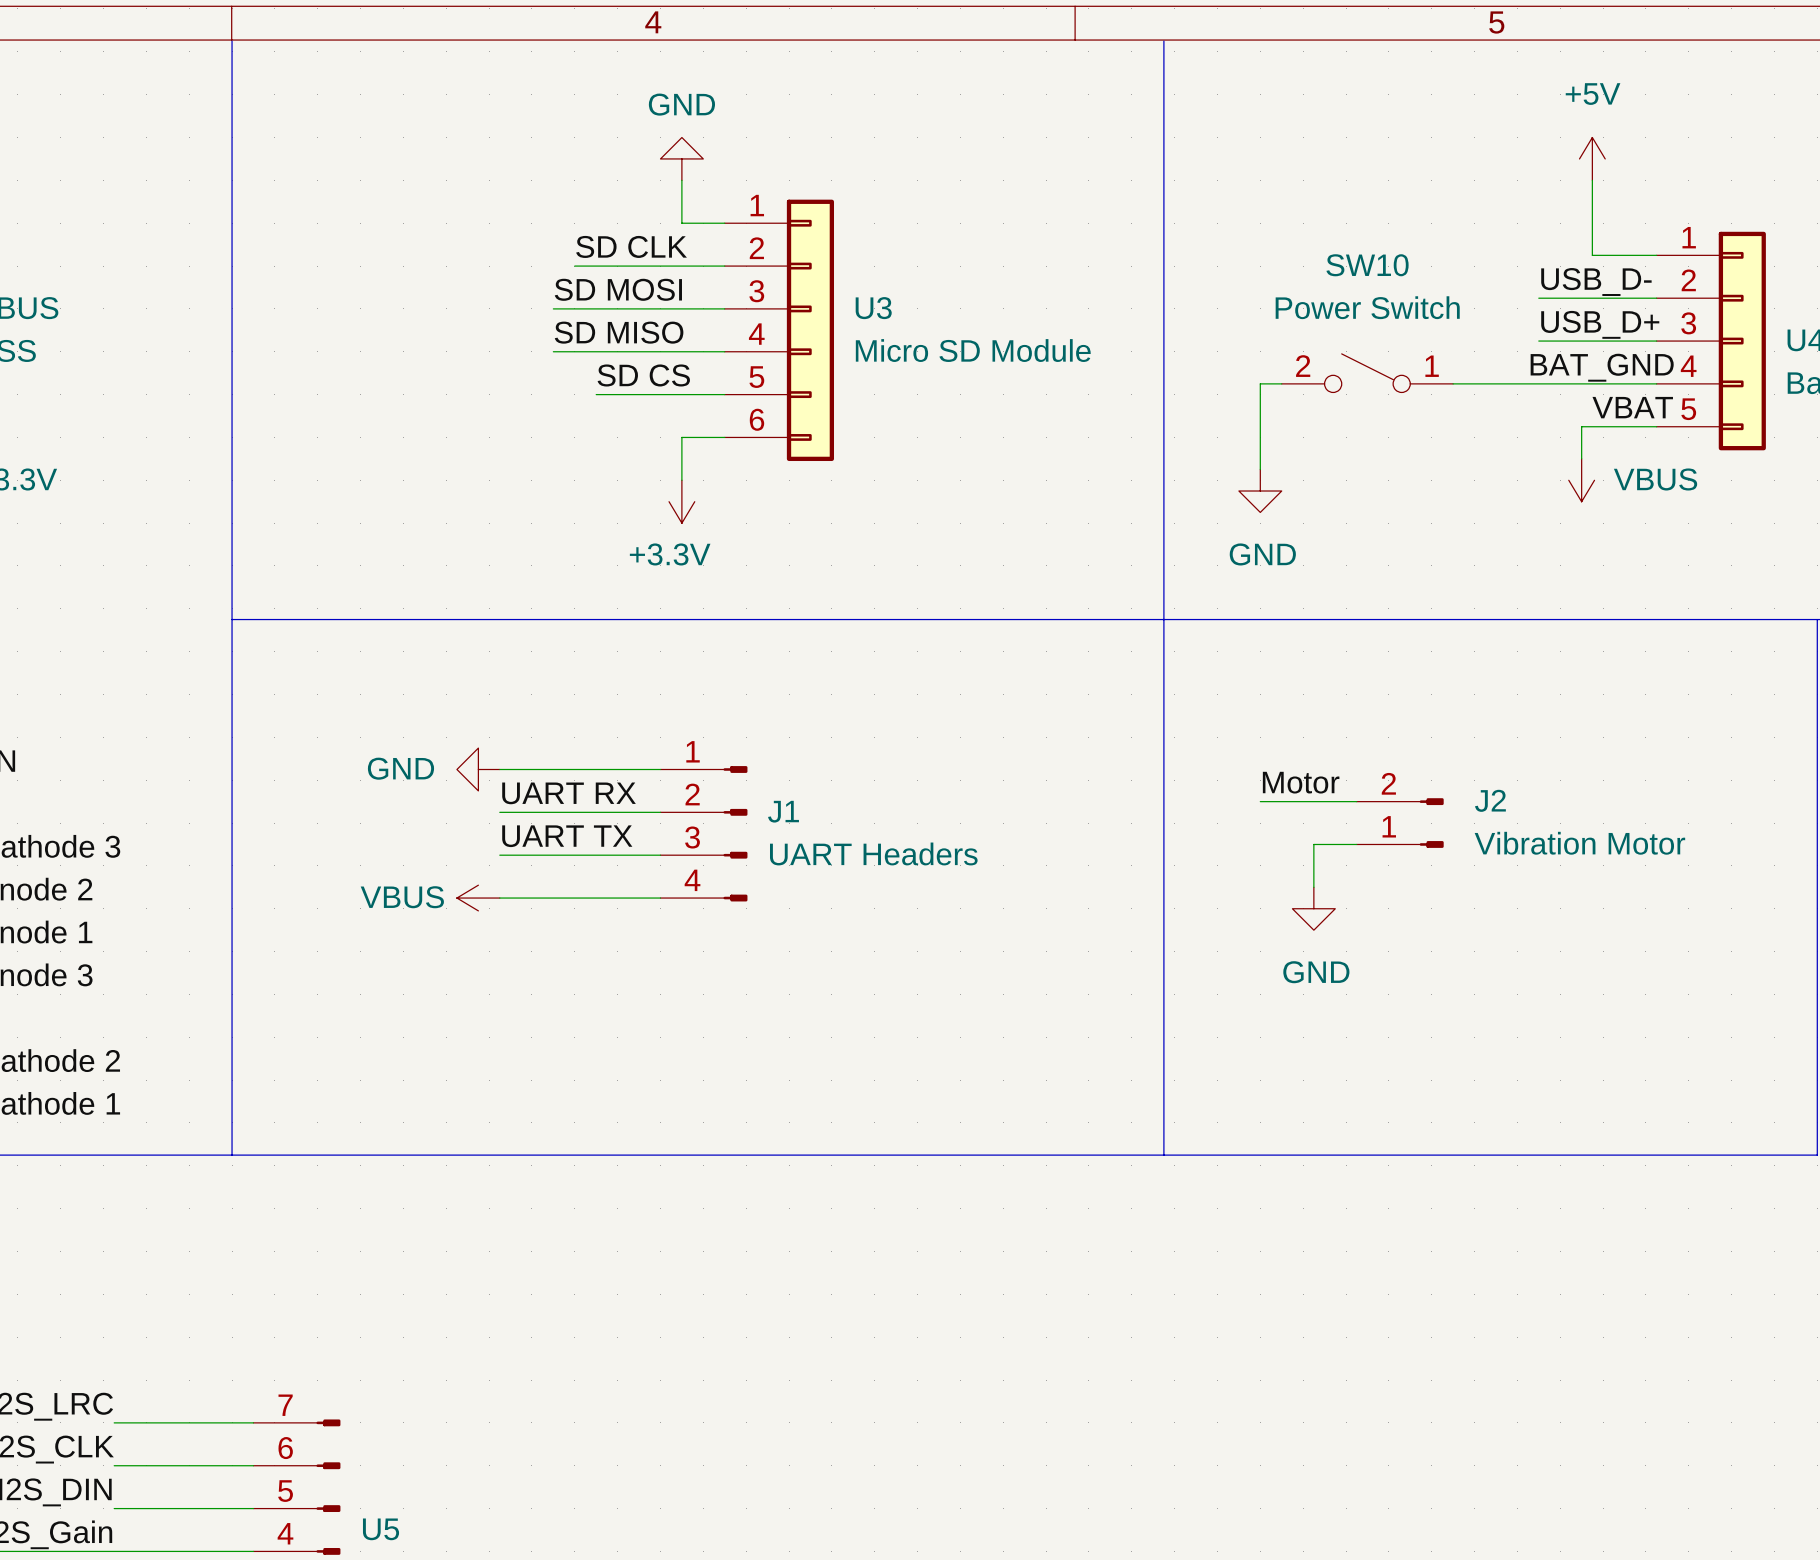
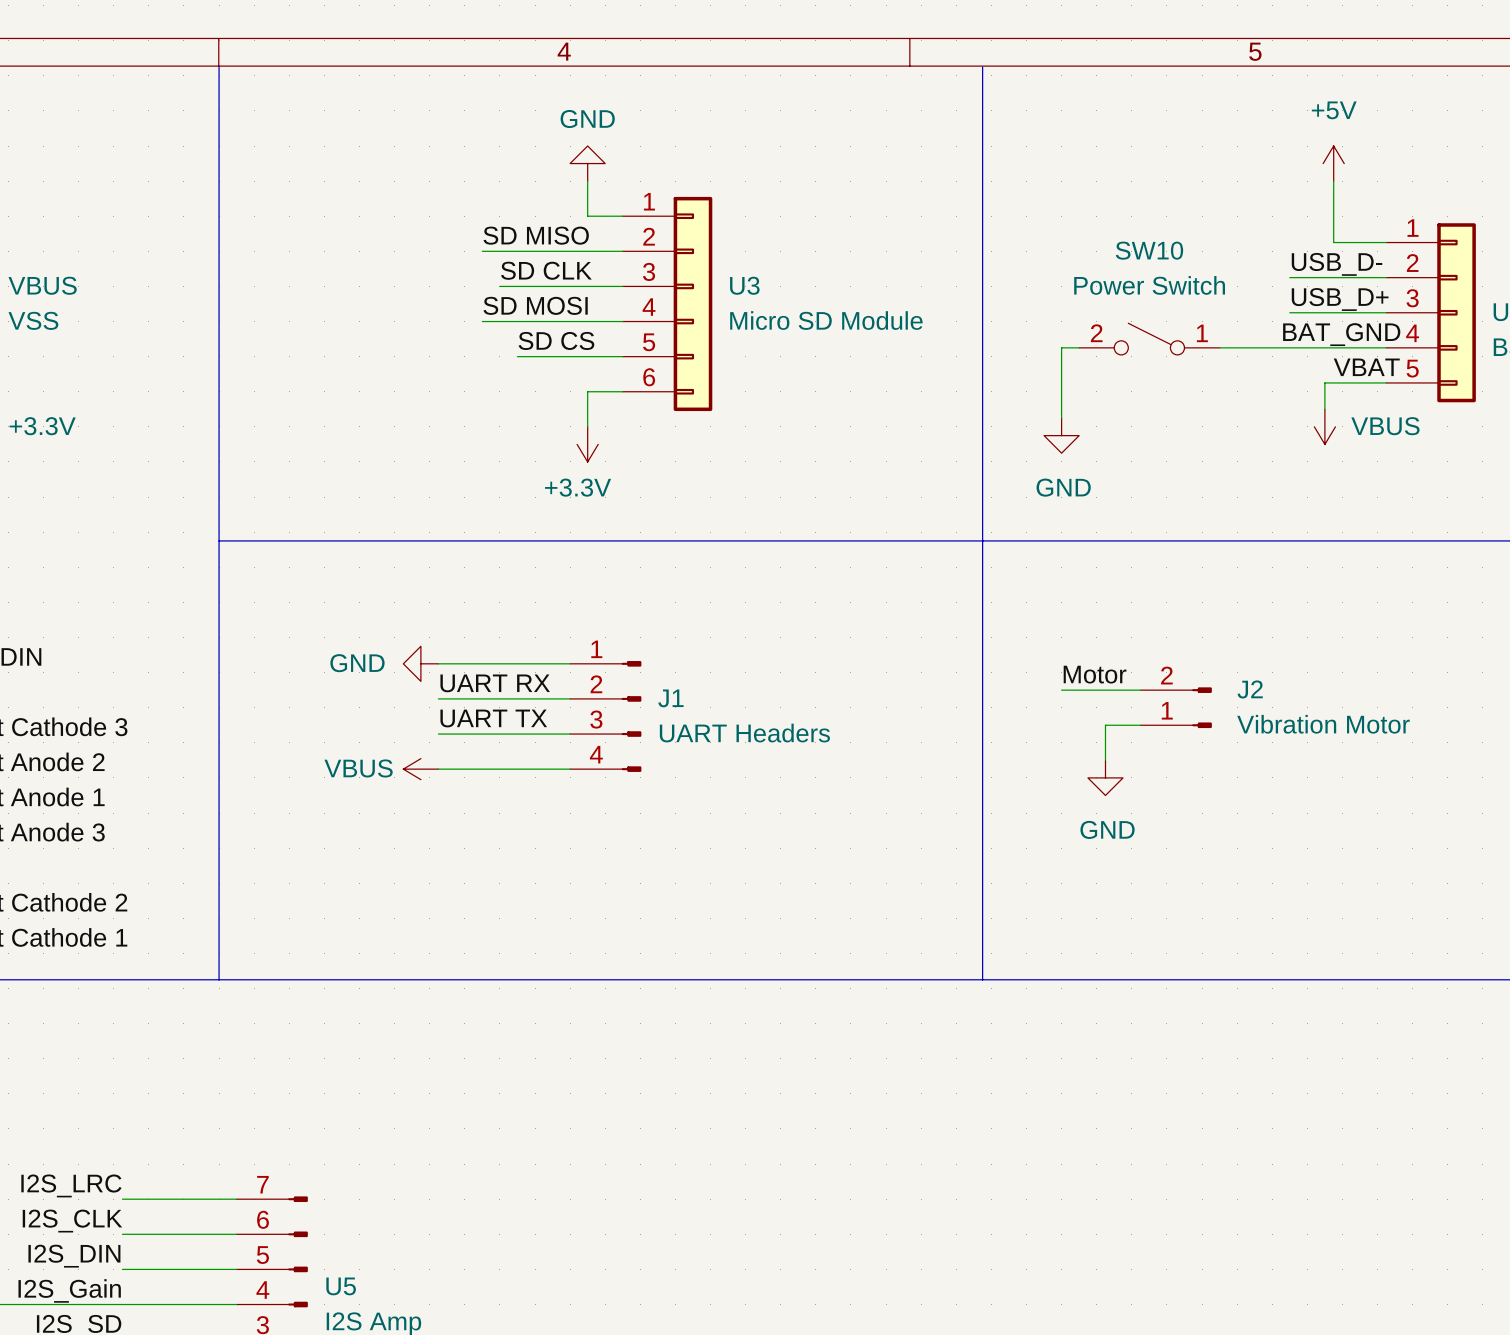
label position: SD CLK (631, 246) -> SD CLK (546, 270)
label: SD MOSI (618, 289) -> SD MISO (536, 235)
wire: (553, 308) (574, 308) -> (482, 251) (499, 251)
label: SD MISO (619, 332) -> SD MOSI (535, 305)

